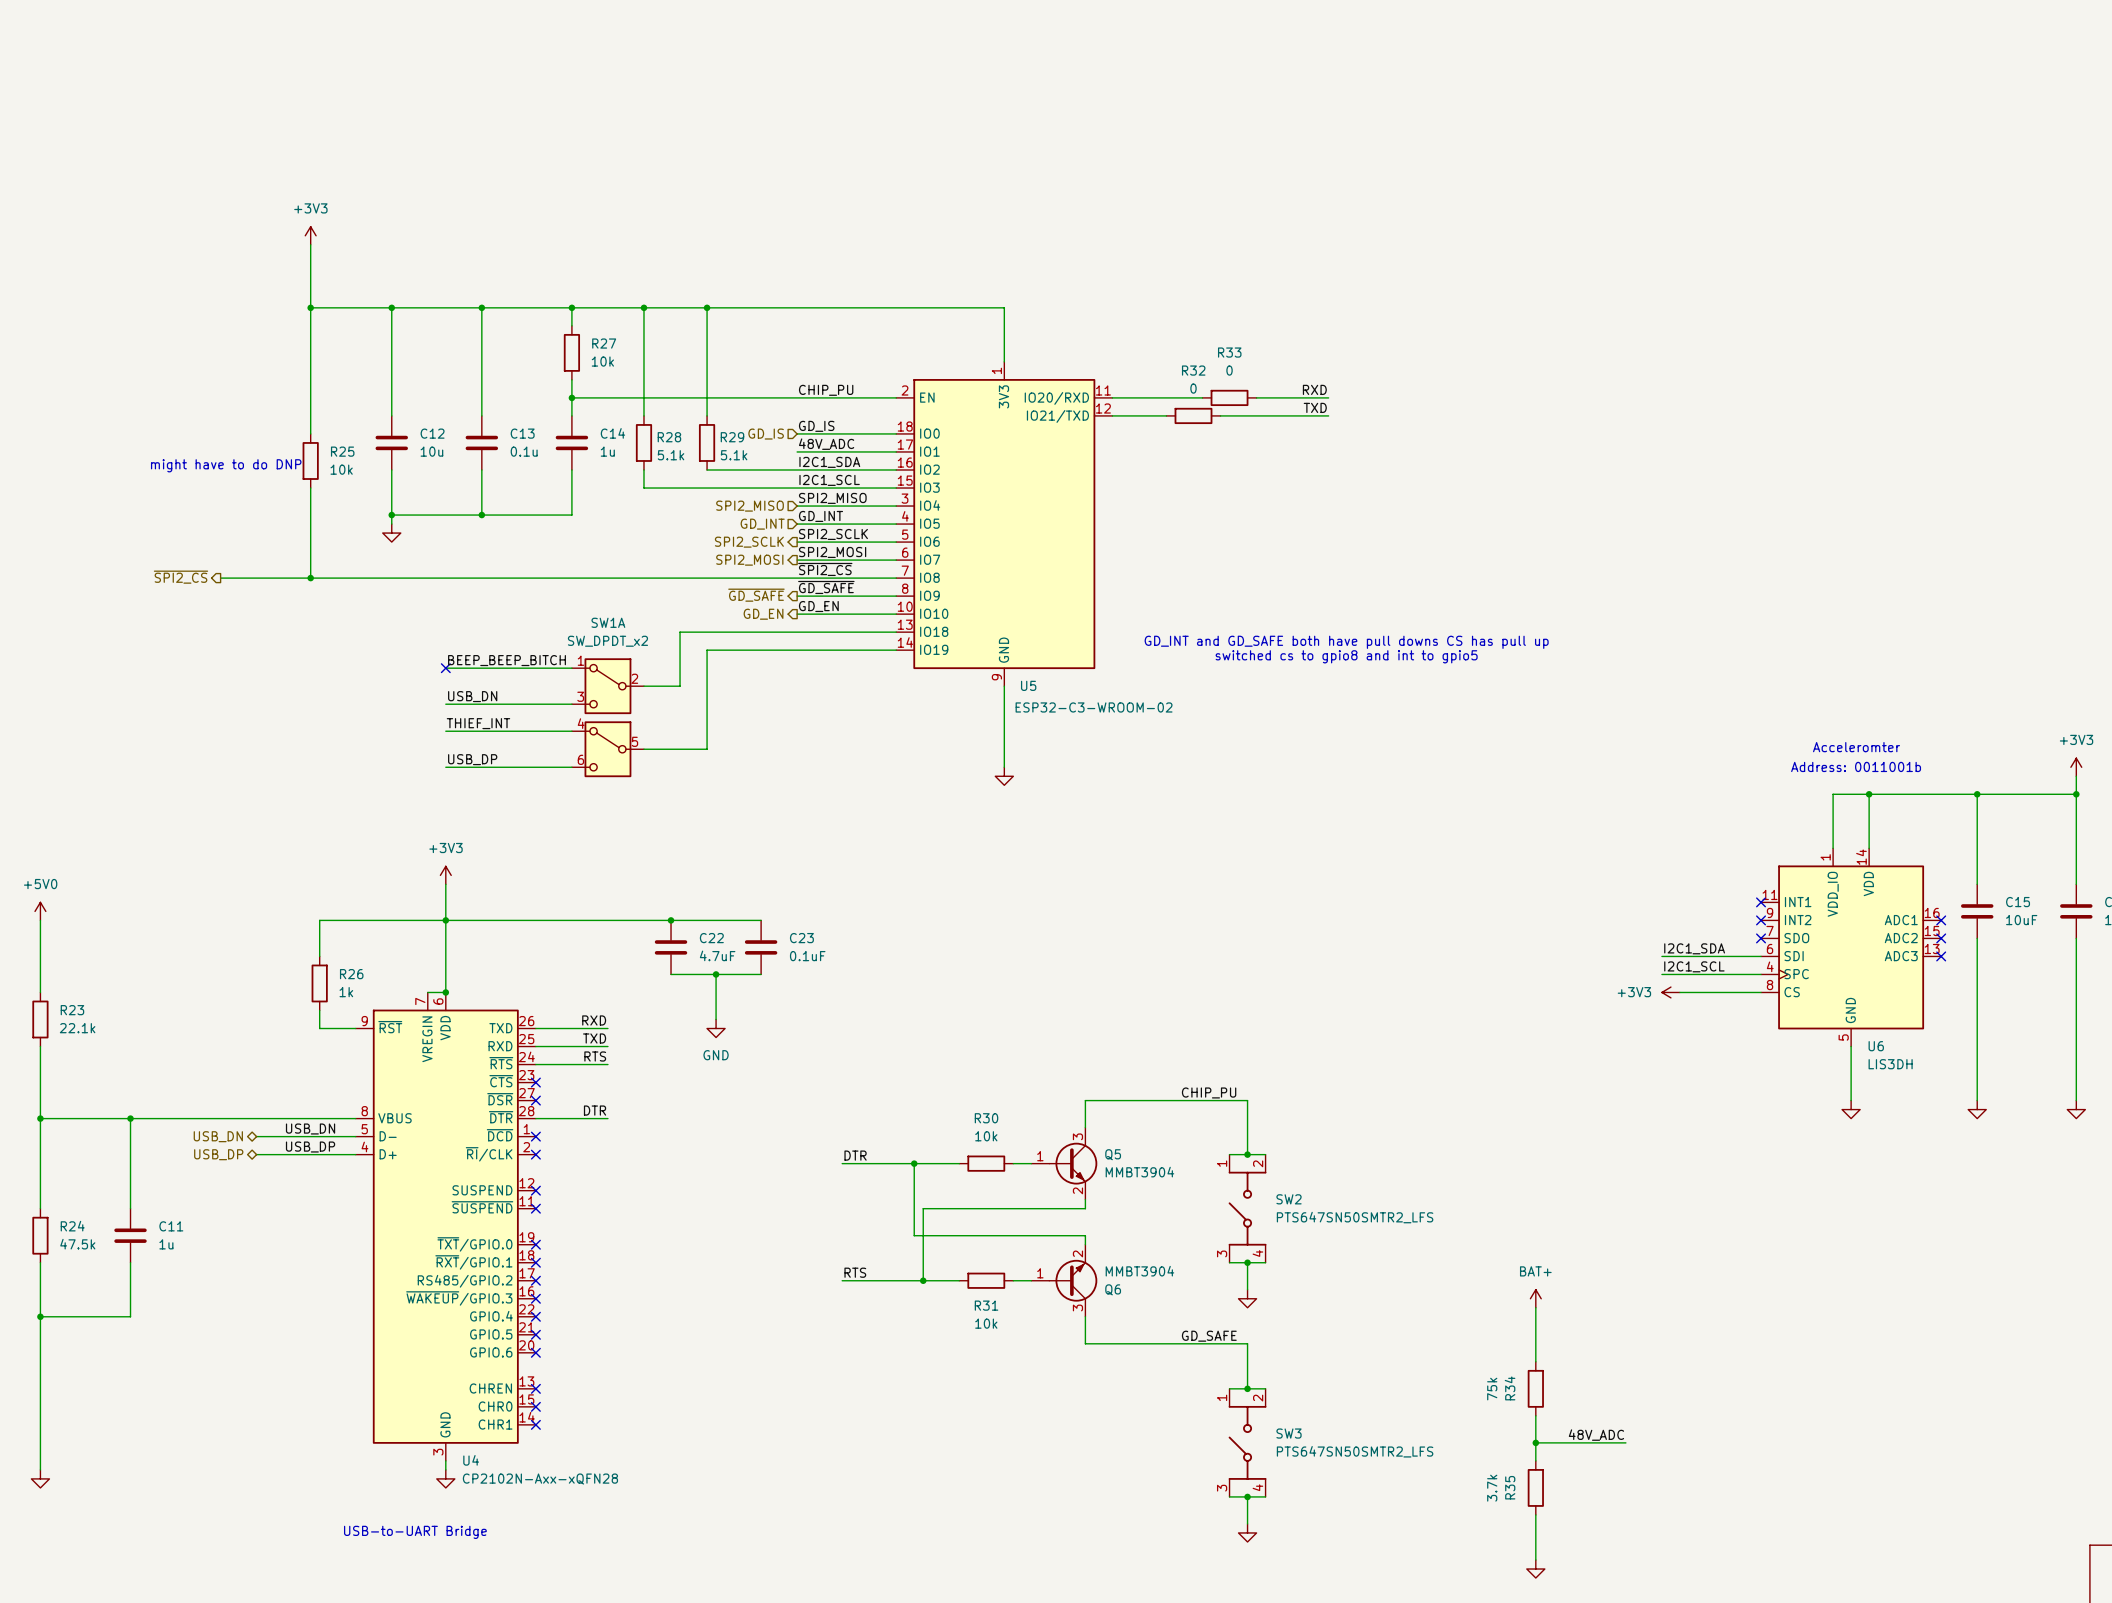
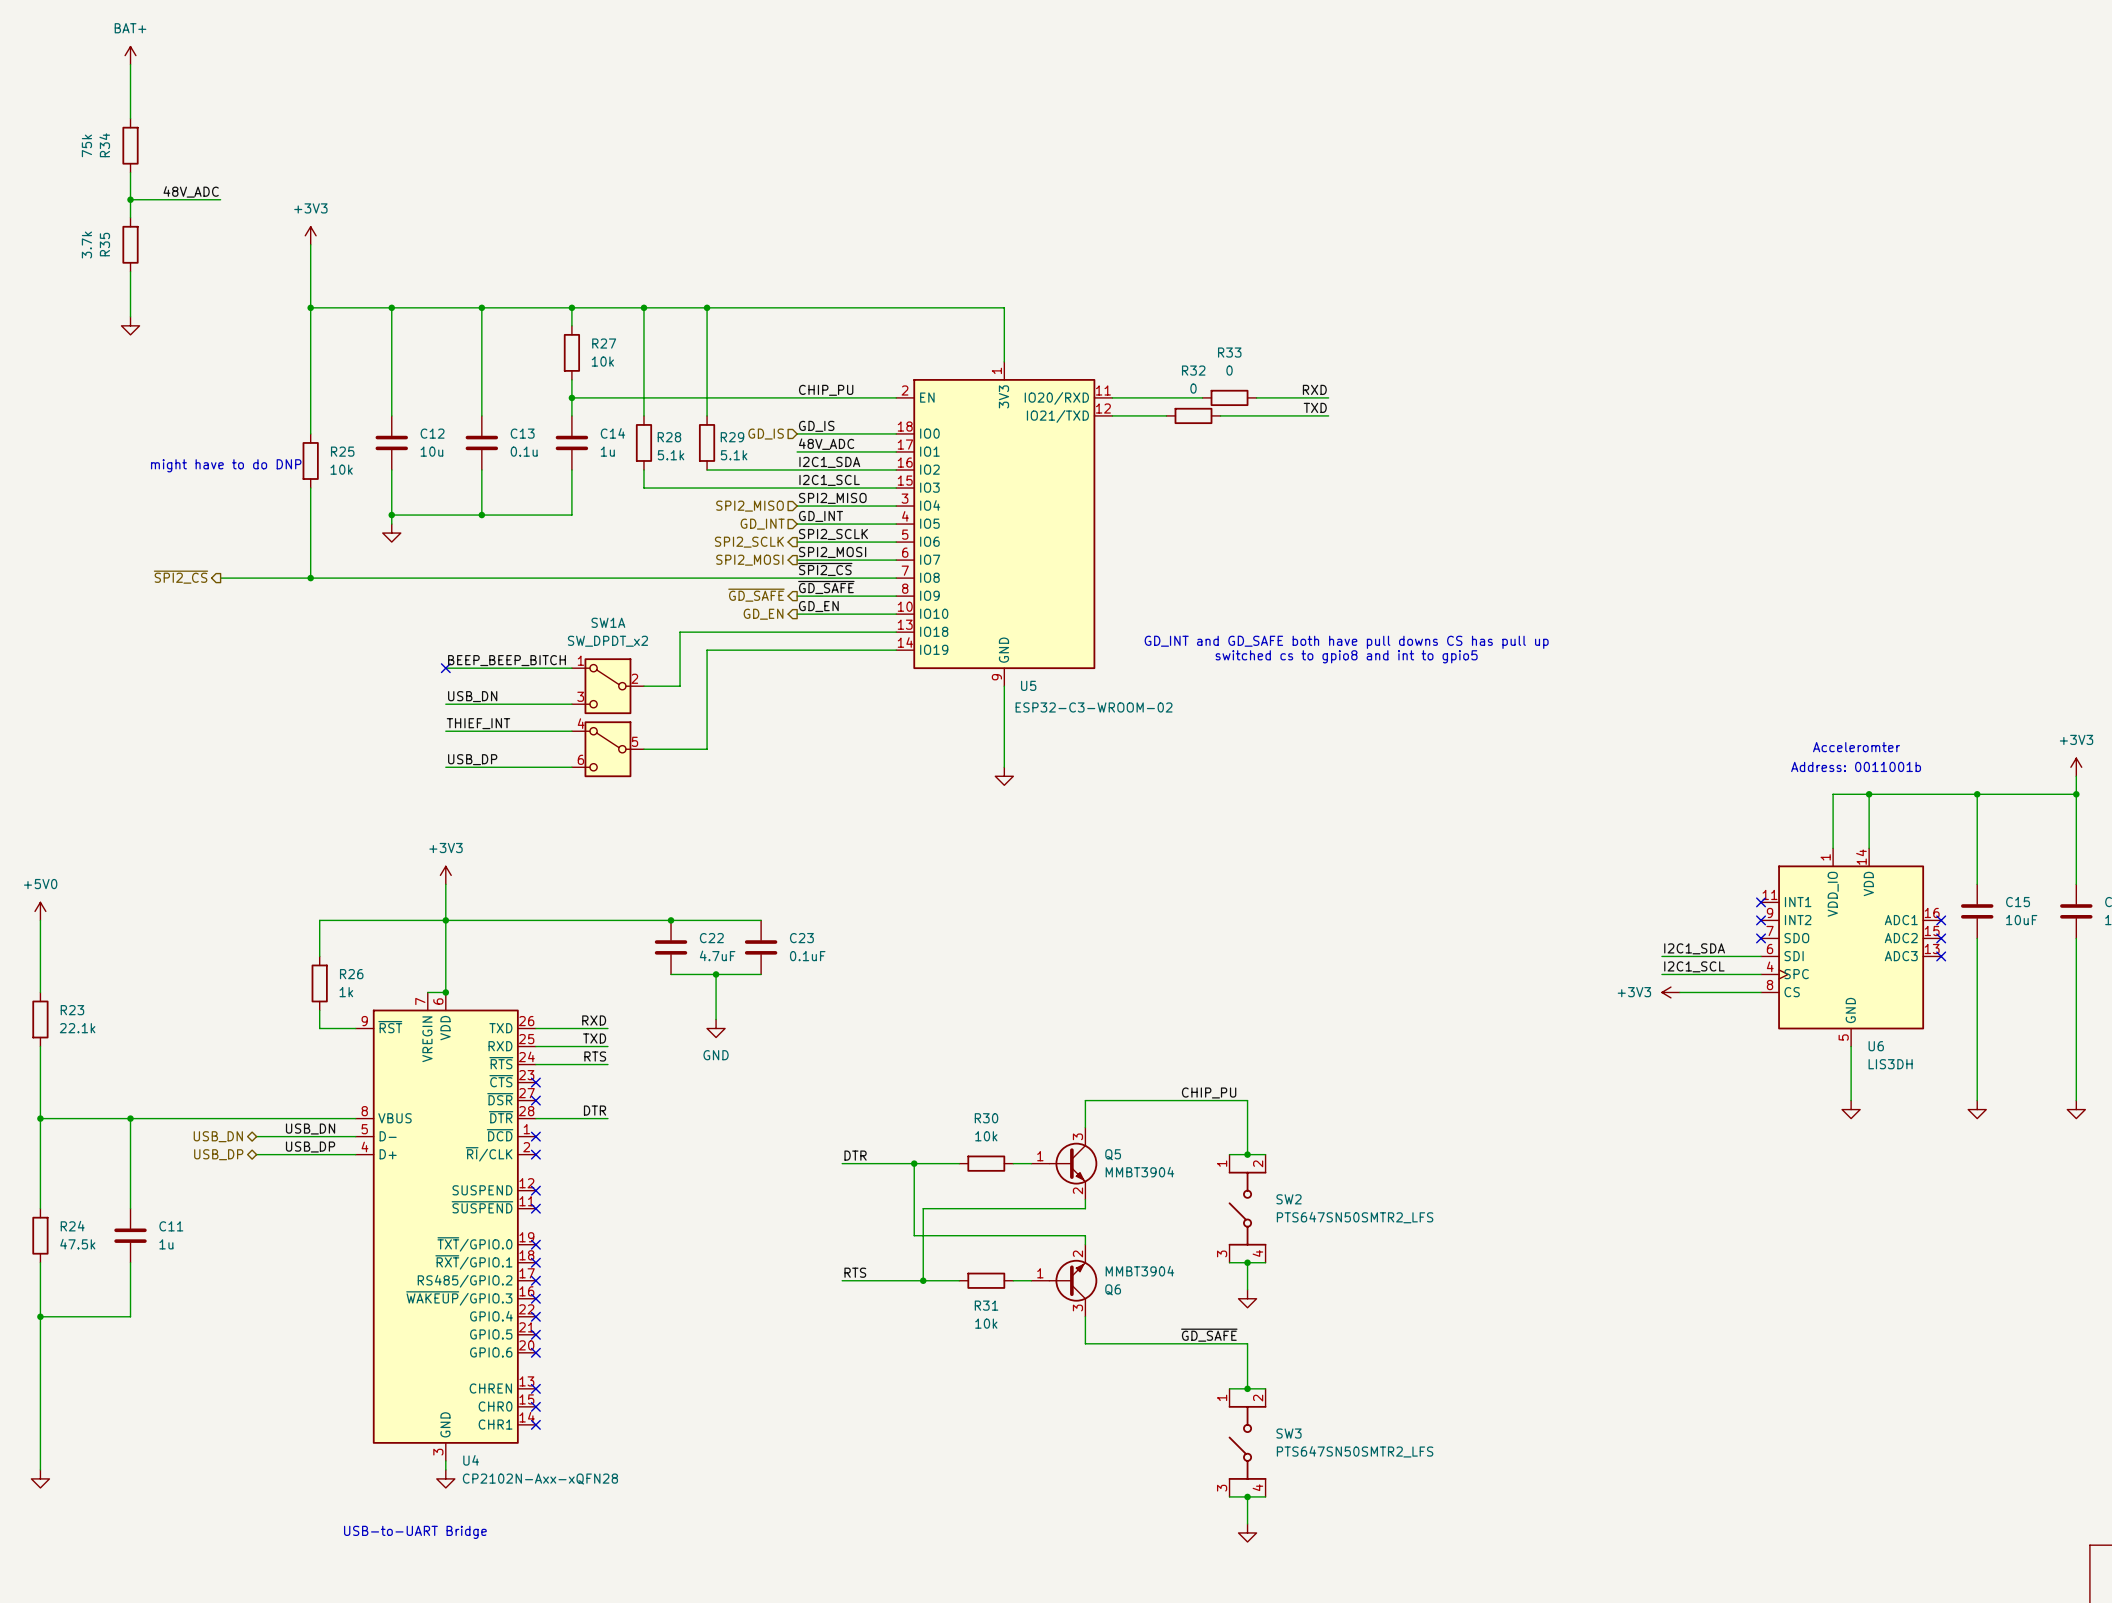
power symbol: none -> BAT+ (130, 55)
wire: none -> (130, 64) (130, 118)
wire: none -> (130, 172) (130, 217)
label: none -> 48V_ADC (191, 191)
wire: none -> (130, 199) (220, 199)
junction: none -> (130, 199)
wire: none -> (130, 271) (130, 316)
power symbol: none -> (130, 325)
power symbol: BAT+ (1535, 1298) -> none
wire: (1535, 1307) (1535, 1361) -> none
label: GD_SAFE (1209, 1336) -> ~{GD_SAFE} (1209, 1335)
R34 position: (1535, 1388) -> (130, 145)
wire: (1535, 1415) (1535, 1460) -> none
label: 48V_ADC (1596, 1435) -> none
wire: (1535, 1442) (1625, 1442) -> none
junction: (1535, 1442) -> none
R35 position: (1535, 1487) -> (130, 244)
wire: (1535, 1514) (1535, 1560) -> none
power symbol: (1535, 1569) -> none

